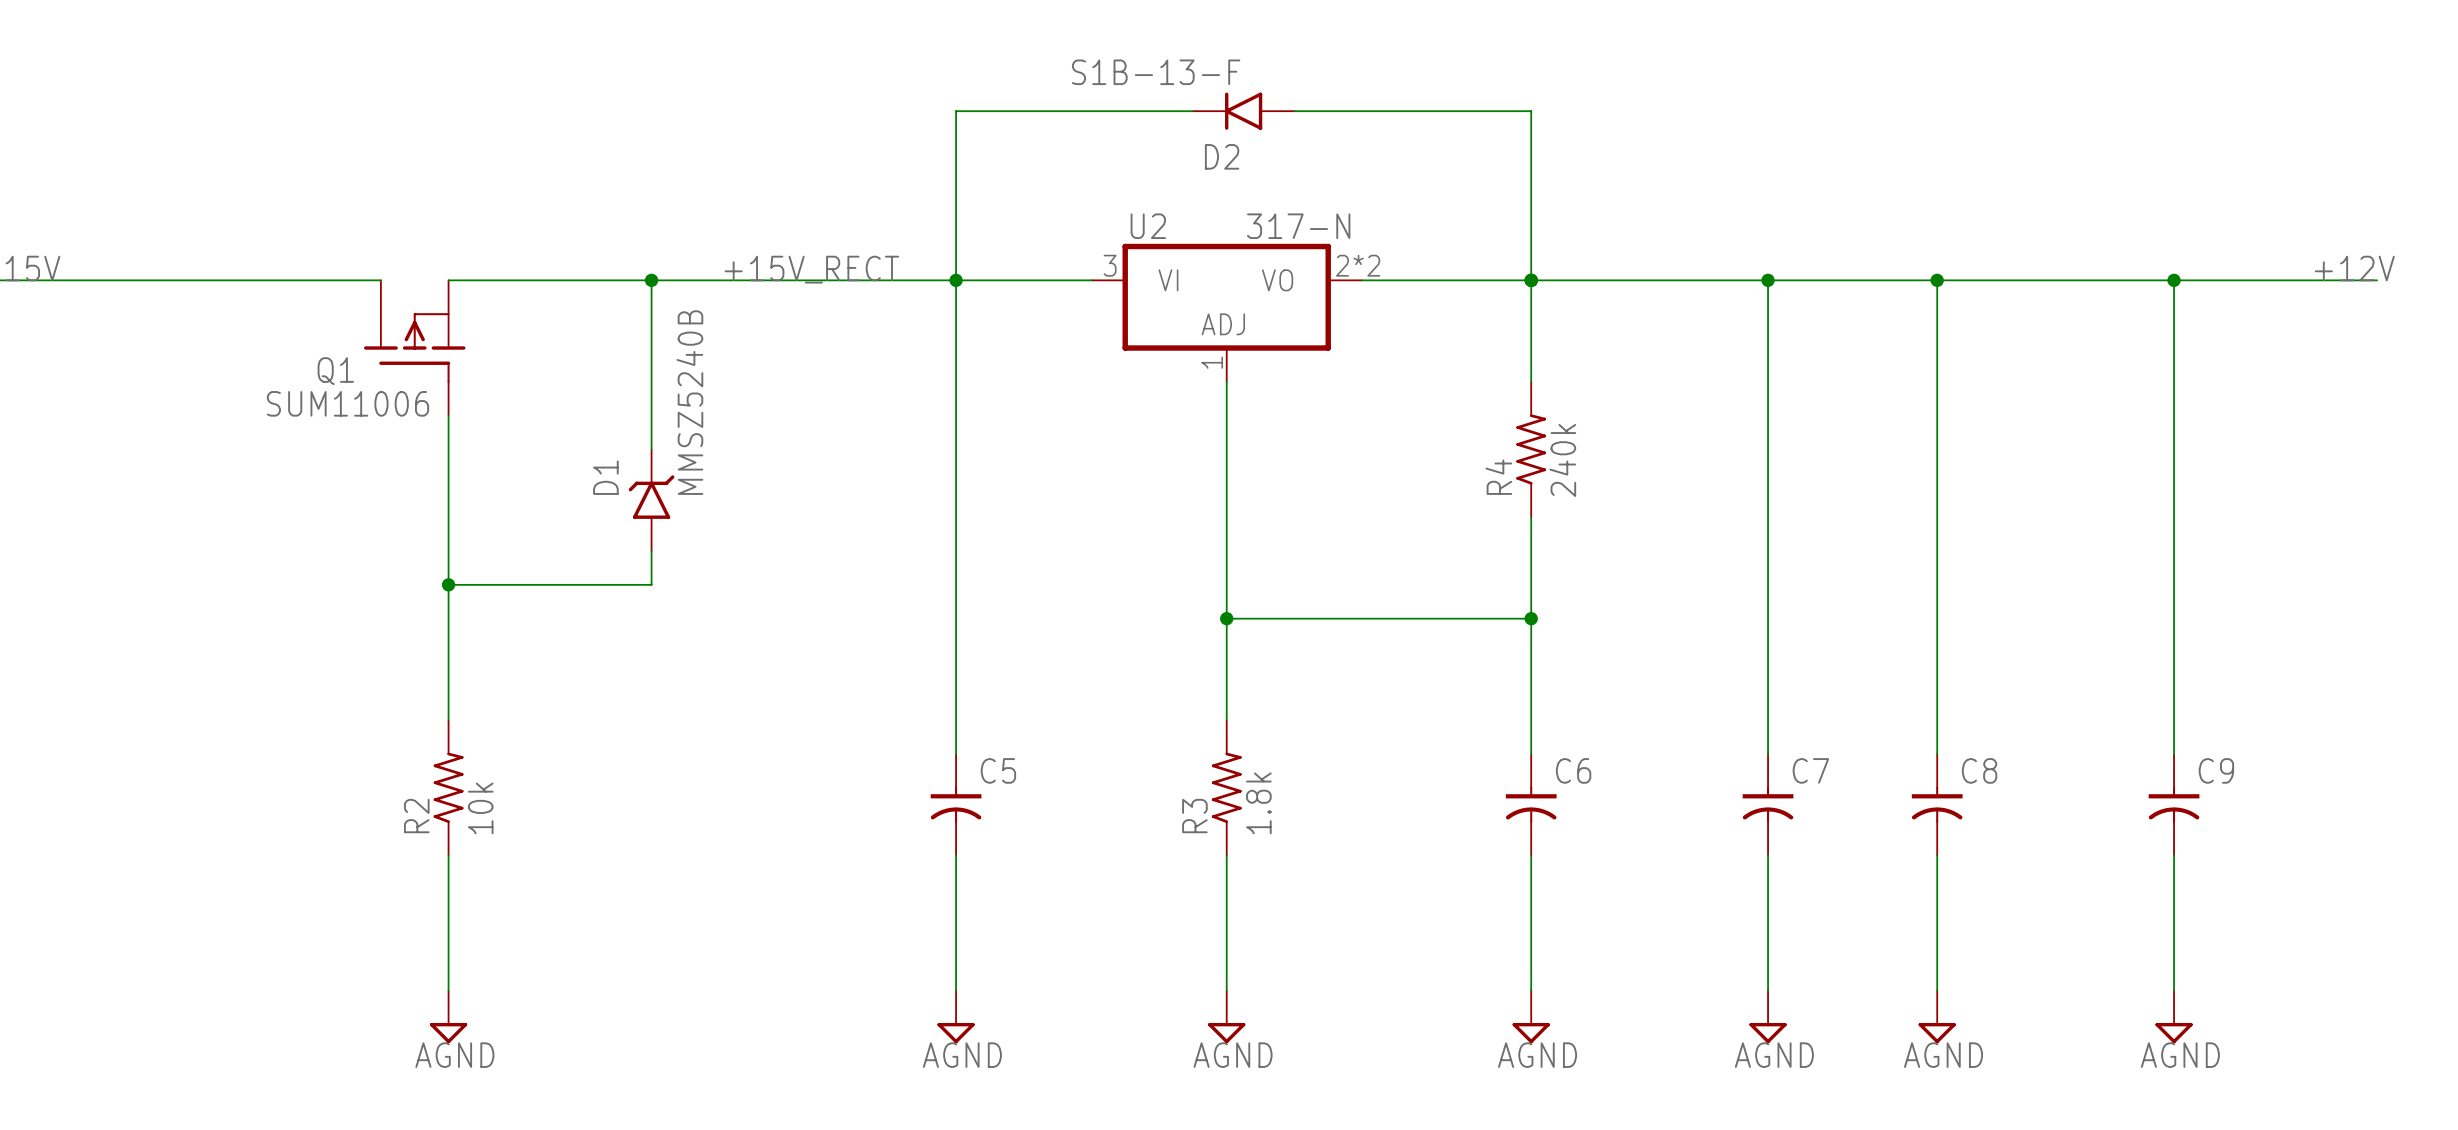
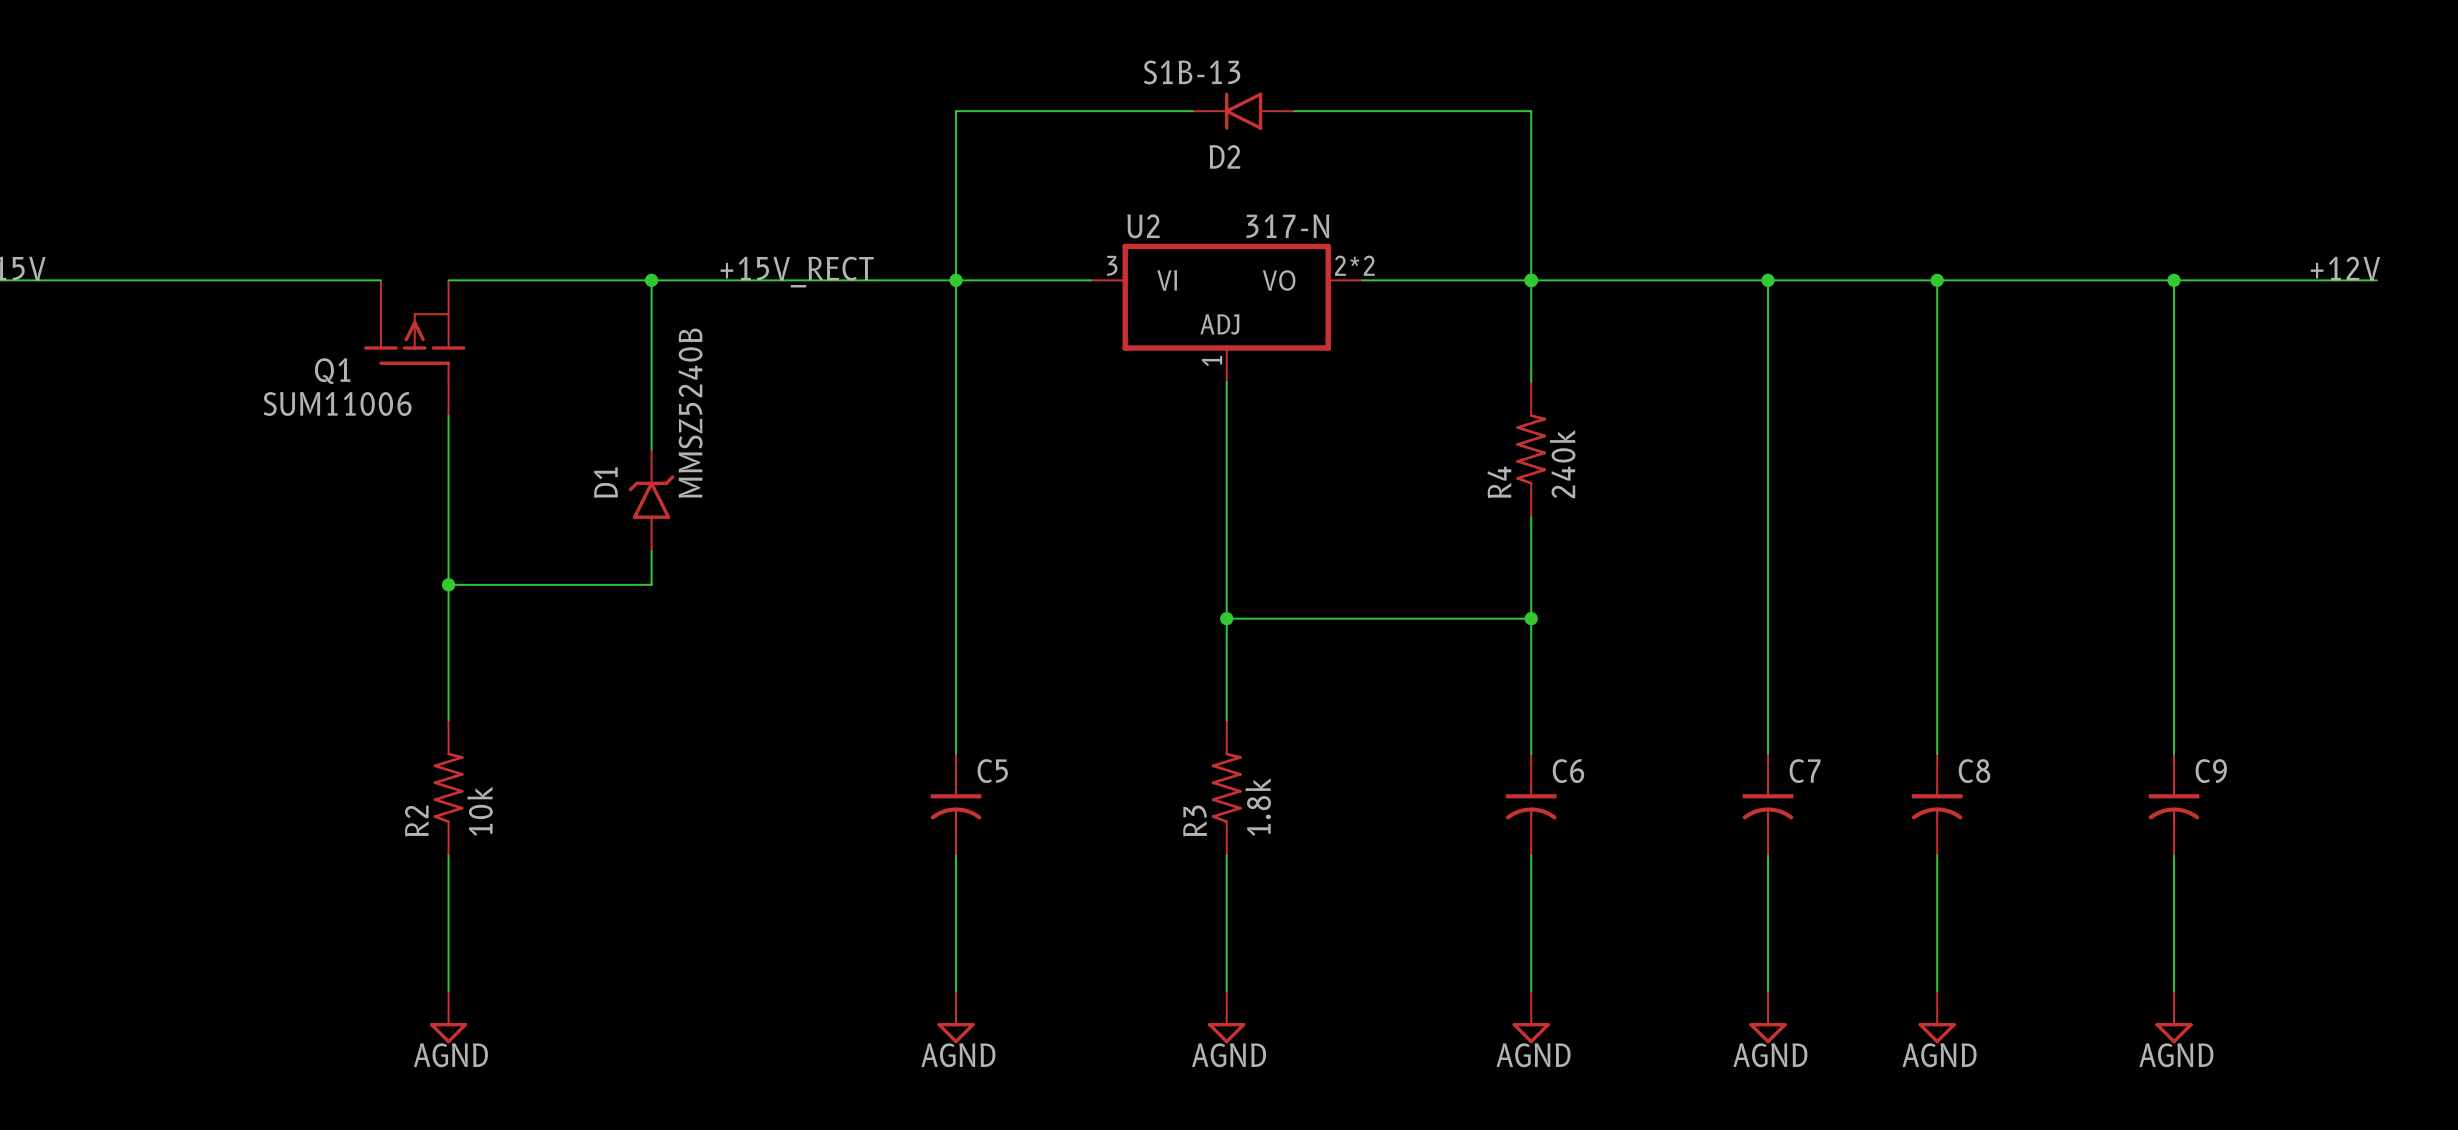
D2 value: S1B-13-F (1156, 72) -> S1B-13 (1192, 72)

